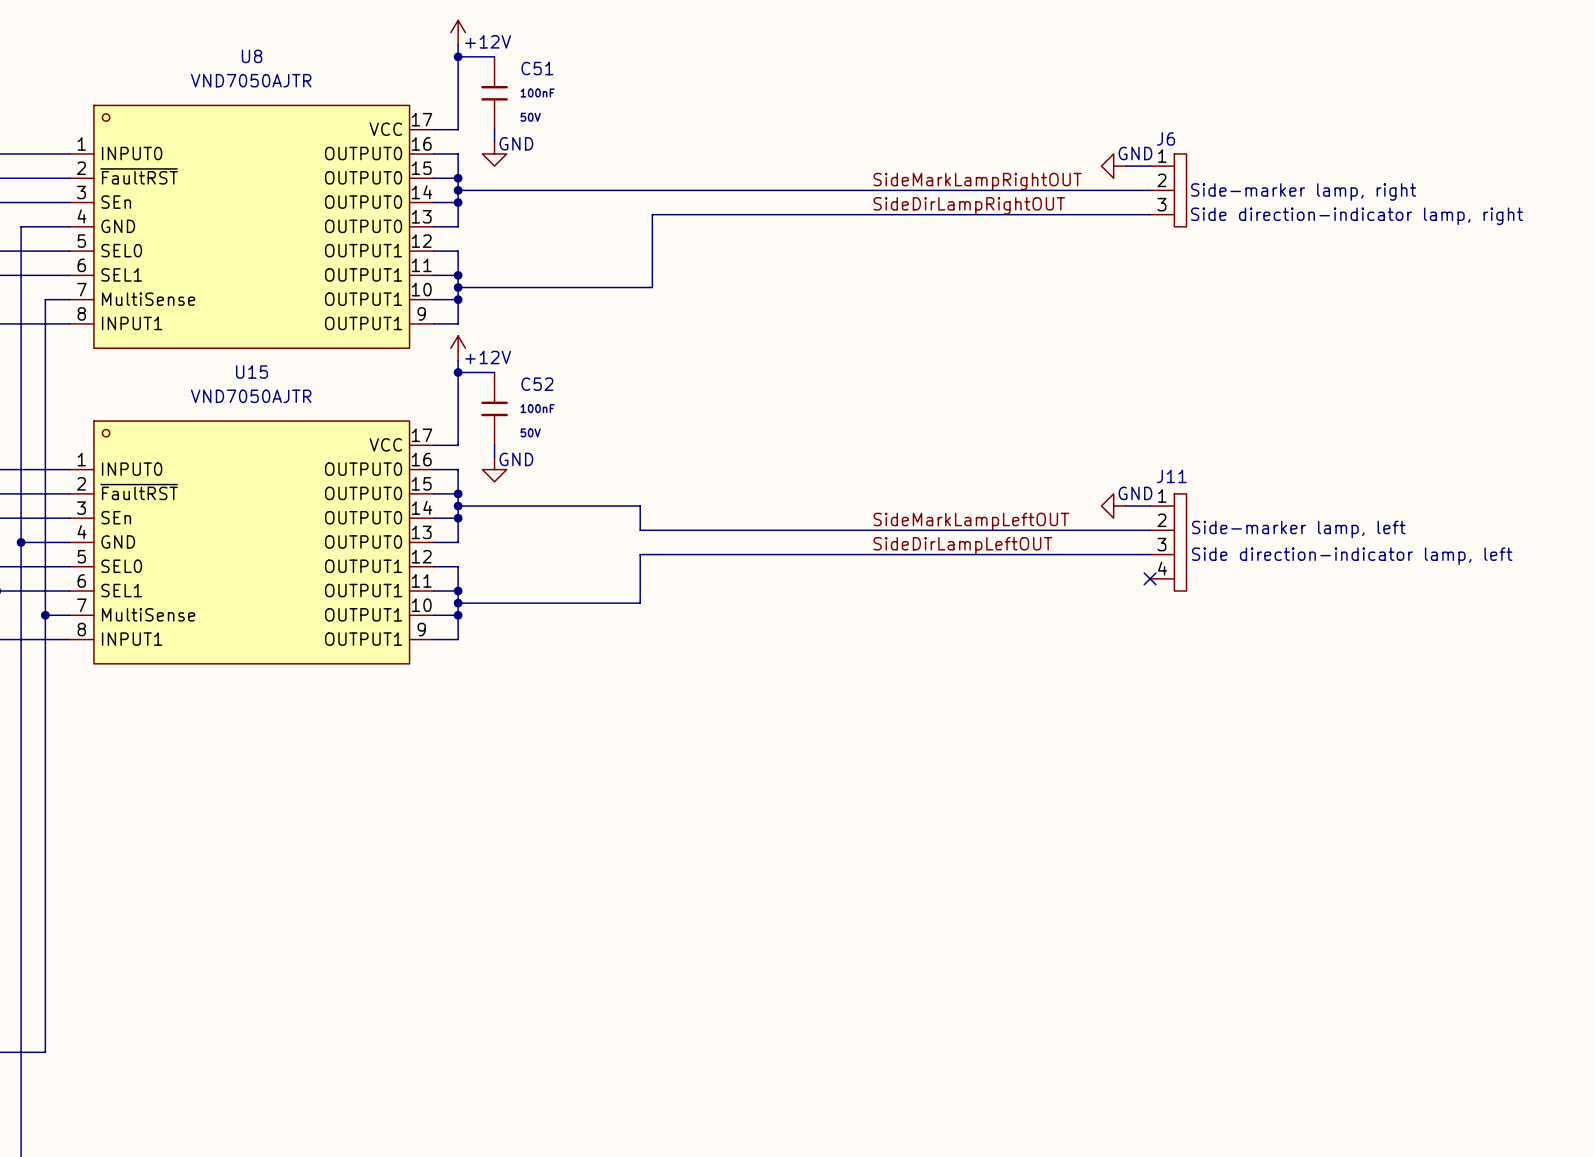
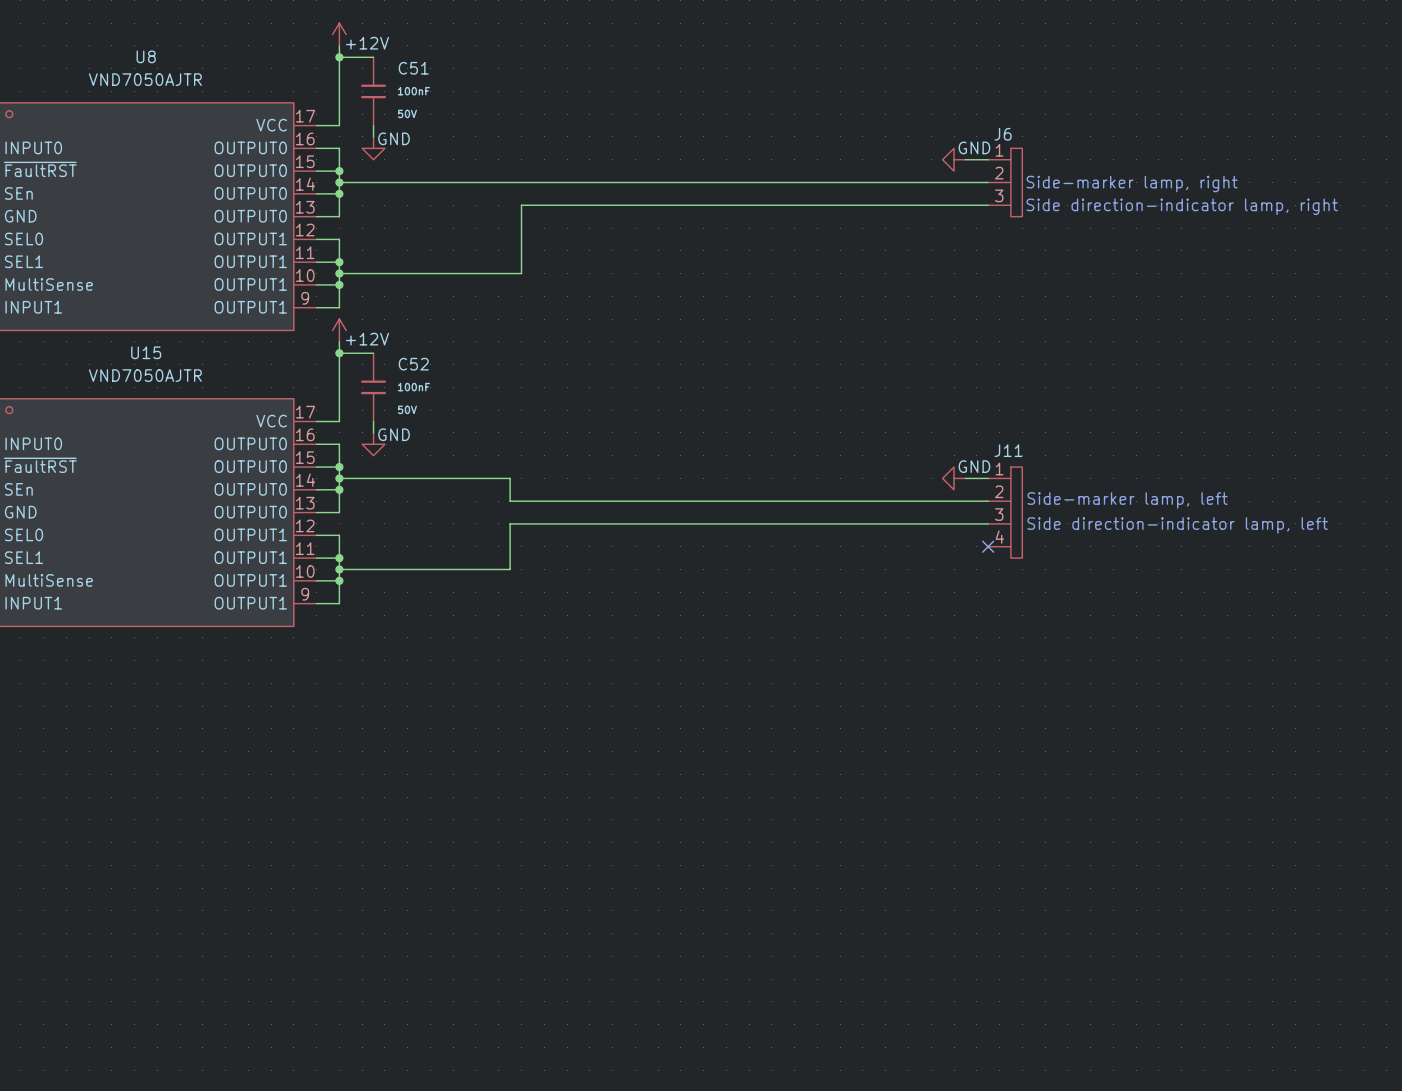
label: SideMarkLampRightOUT (977, 181) -> none
label: SideDirLampRightOUT (969, 205) -> none
label: SideMarkLampLeftOUT (971, 521) -> none
label: SideDirLampLeftOUT (962, 545) -> none

